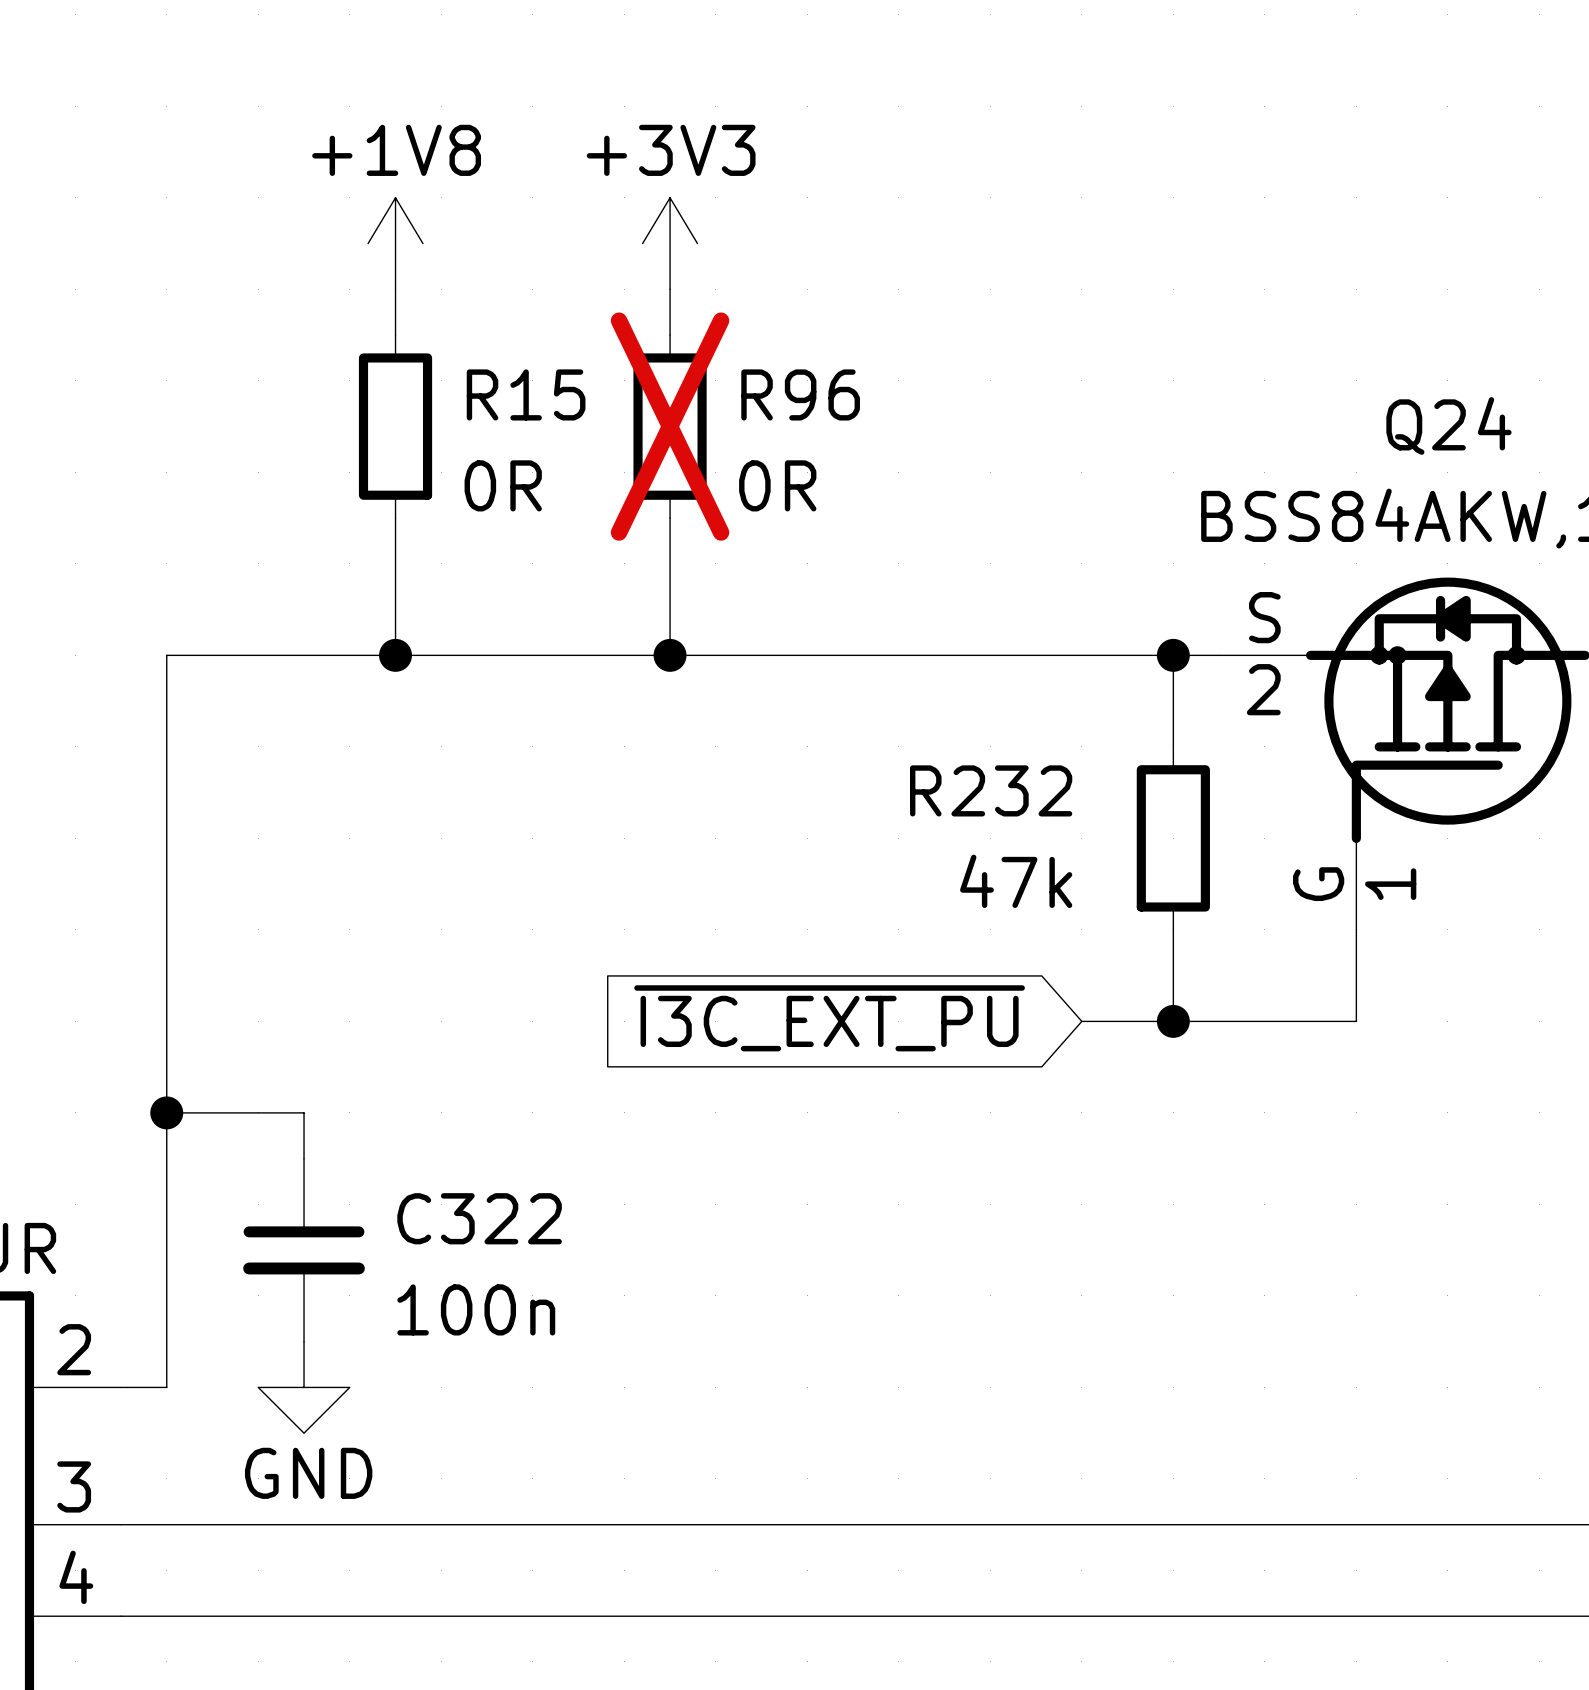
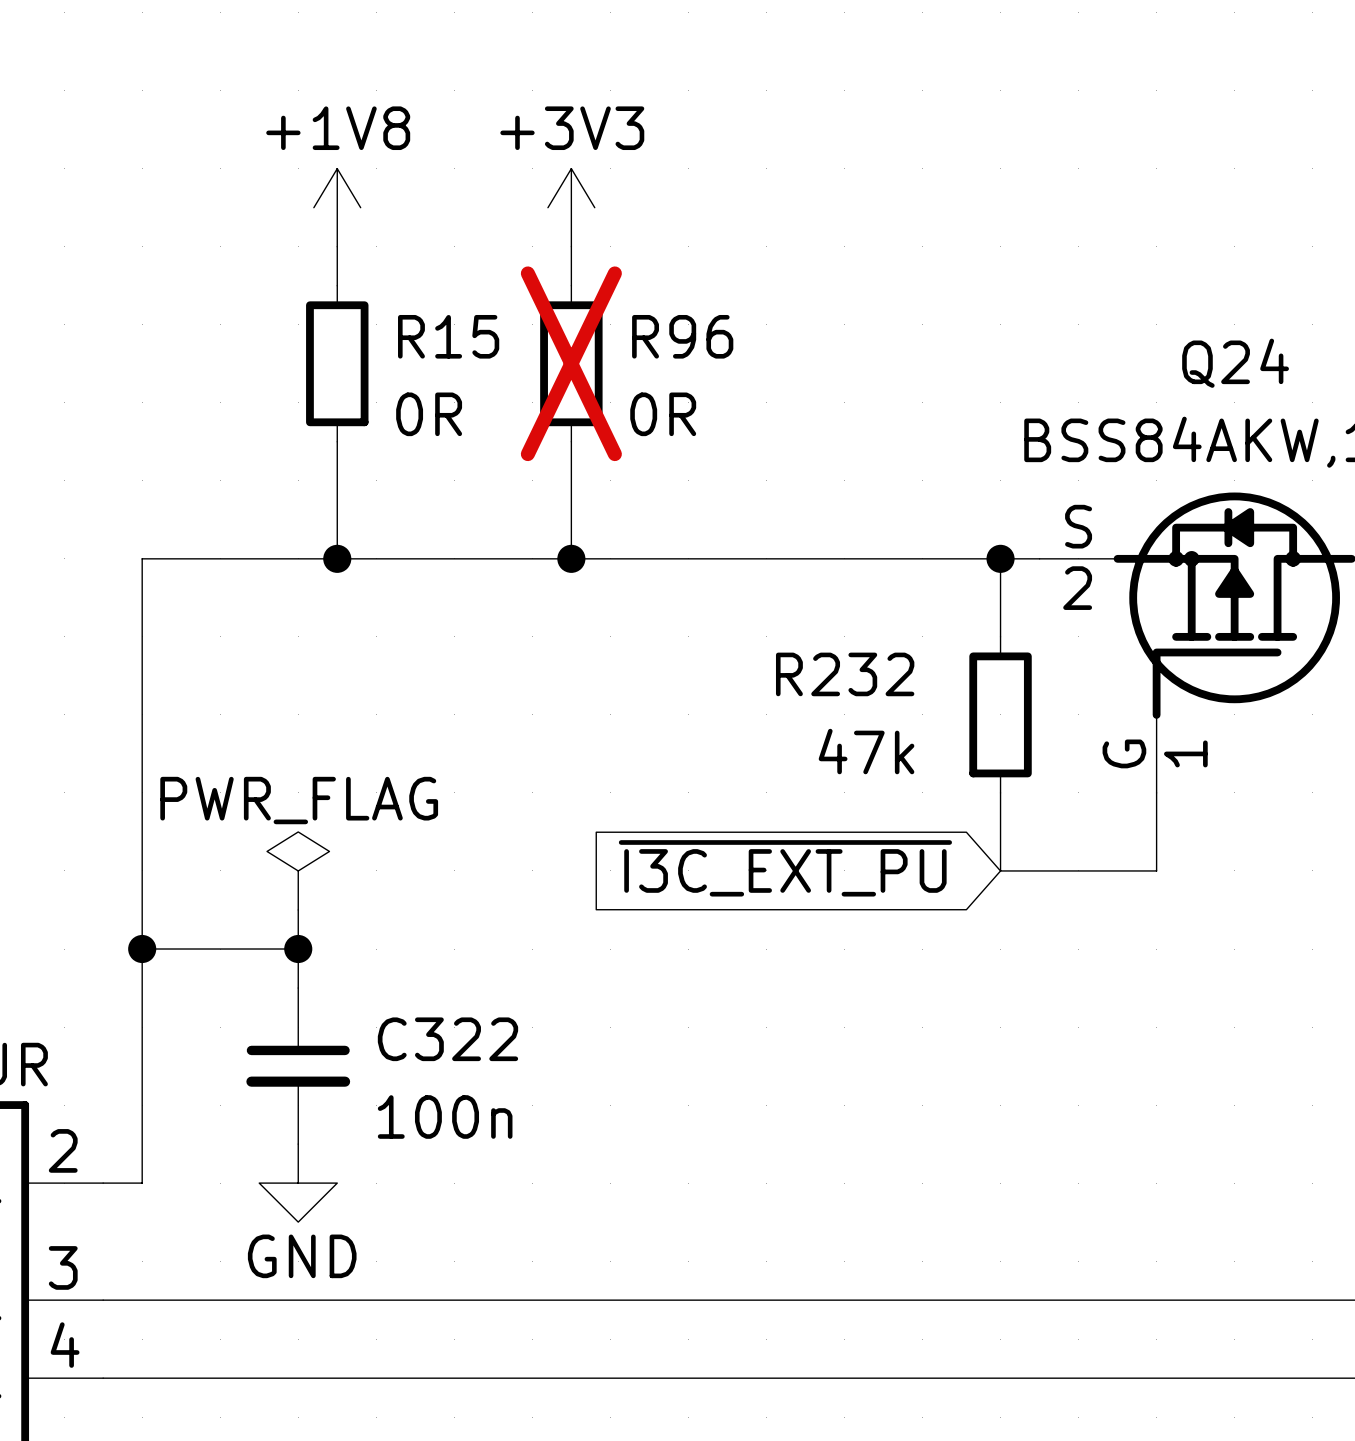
global label position: ~{I3C_EXT_PU} (829, 1018) -> ~{I3C_EXT_PU} (785, 868)
power symbol: none -> PWR_FLAG (298, 870)
wire: (1081, 1021) (1173, 1021) -> none
junction: (1173, 1021) -> none
wire: none -> (298, 909) (298, 988)
wire: (304, 1112) (304, 1158) -> (259, 949) (298, 949)
junction: none -> (298, 949)
C322 position: (304, 1250) -> (298, 1066)
power symbol position: GND (304, 1387) -> GND (298, 1183)

